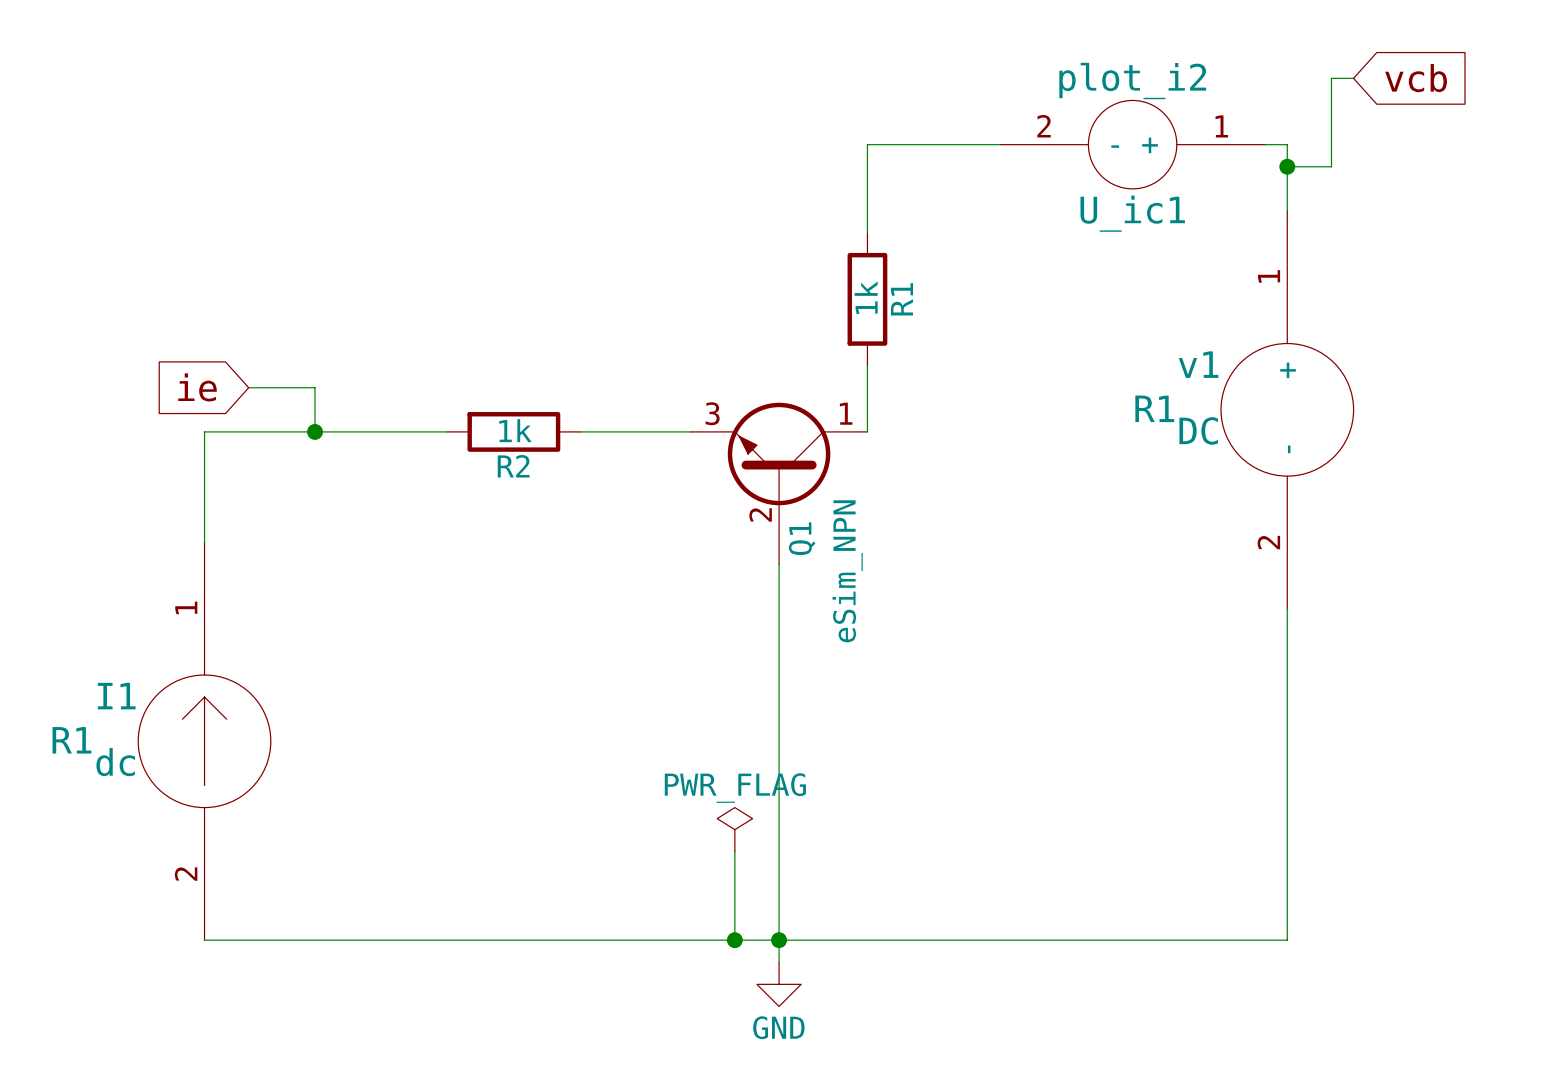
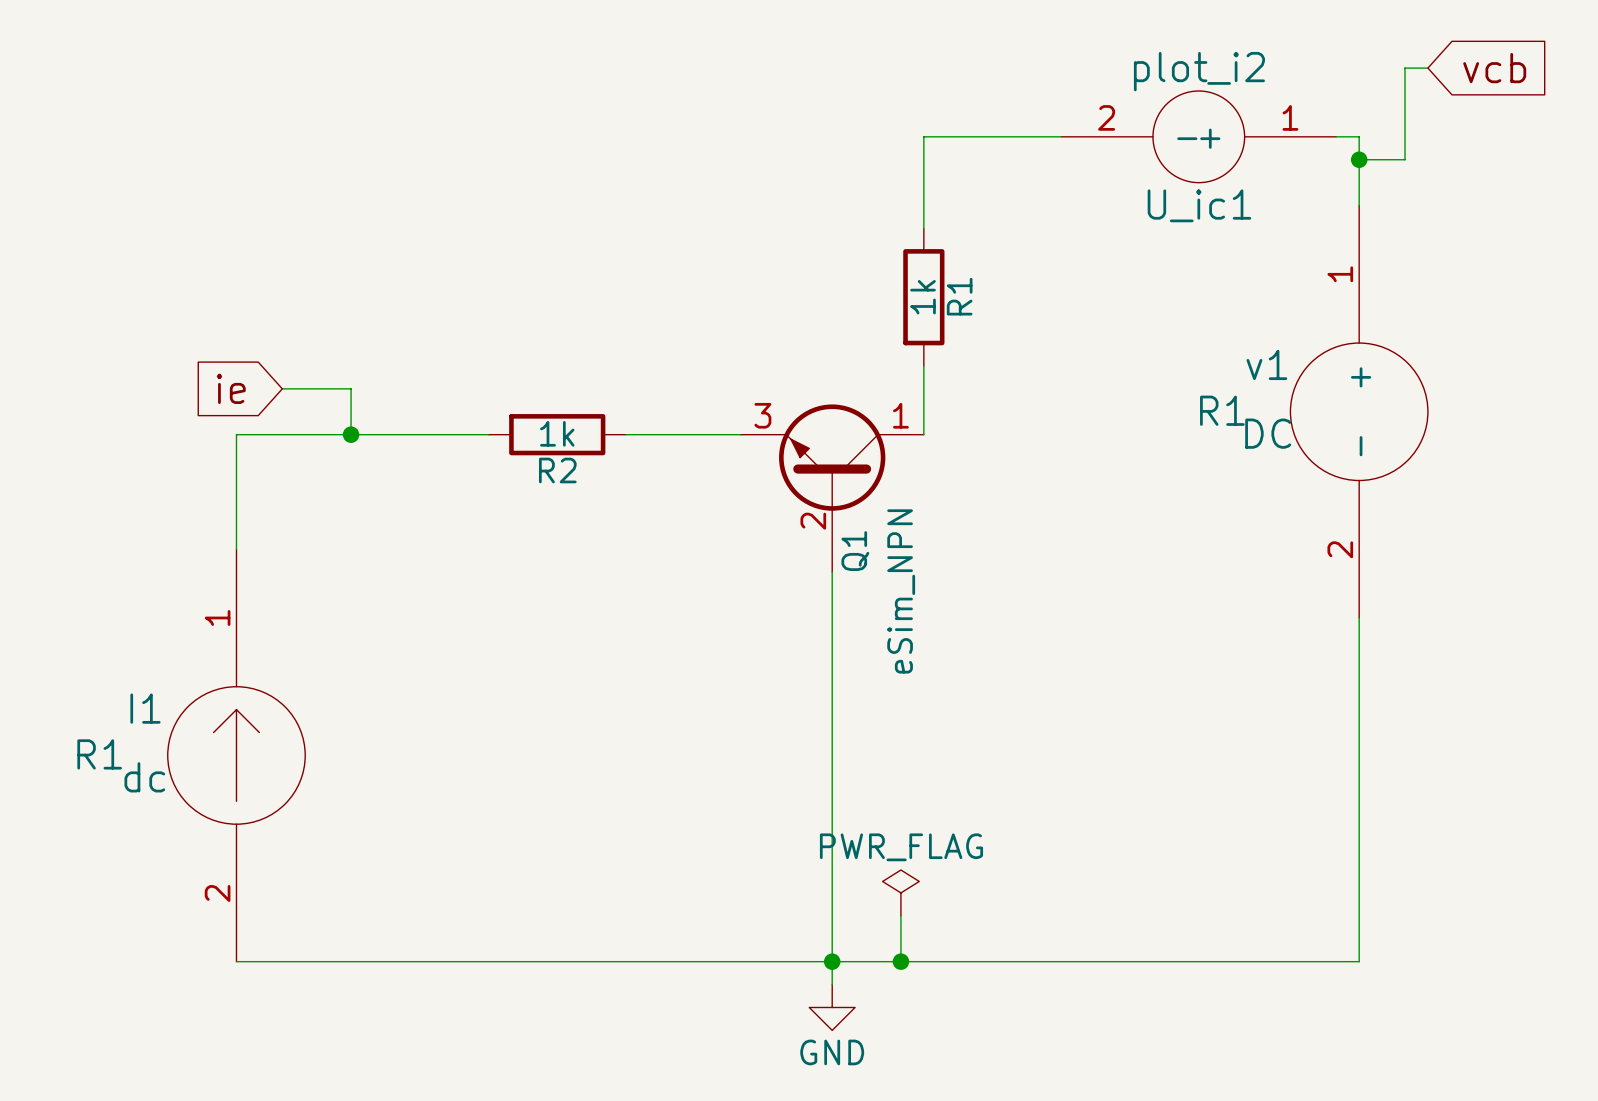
power symbol position: PWR_FLAG (734, 829) -> PWR_FLAG (900, 892)
wire: (734, 851) (734, 940) -> none
wire: none -> (900, 915) (900, 961)
junction: (734, 940) -> none
junction: none -> (900, 961)

